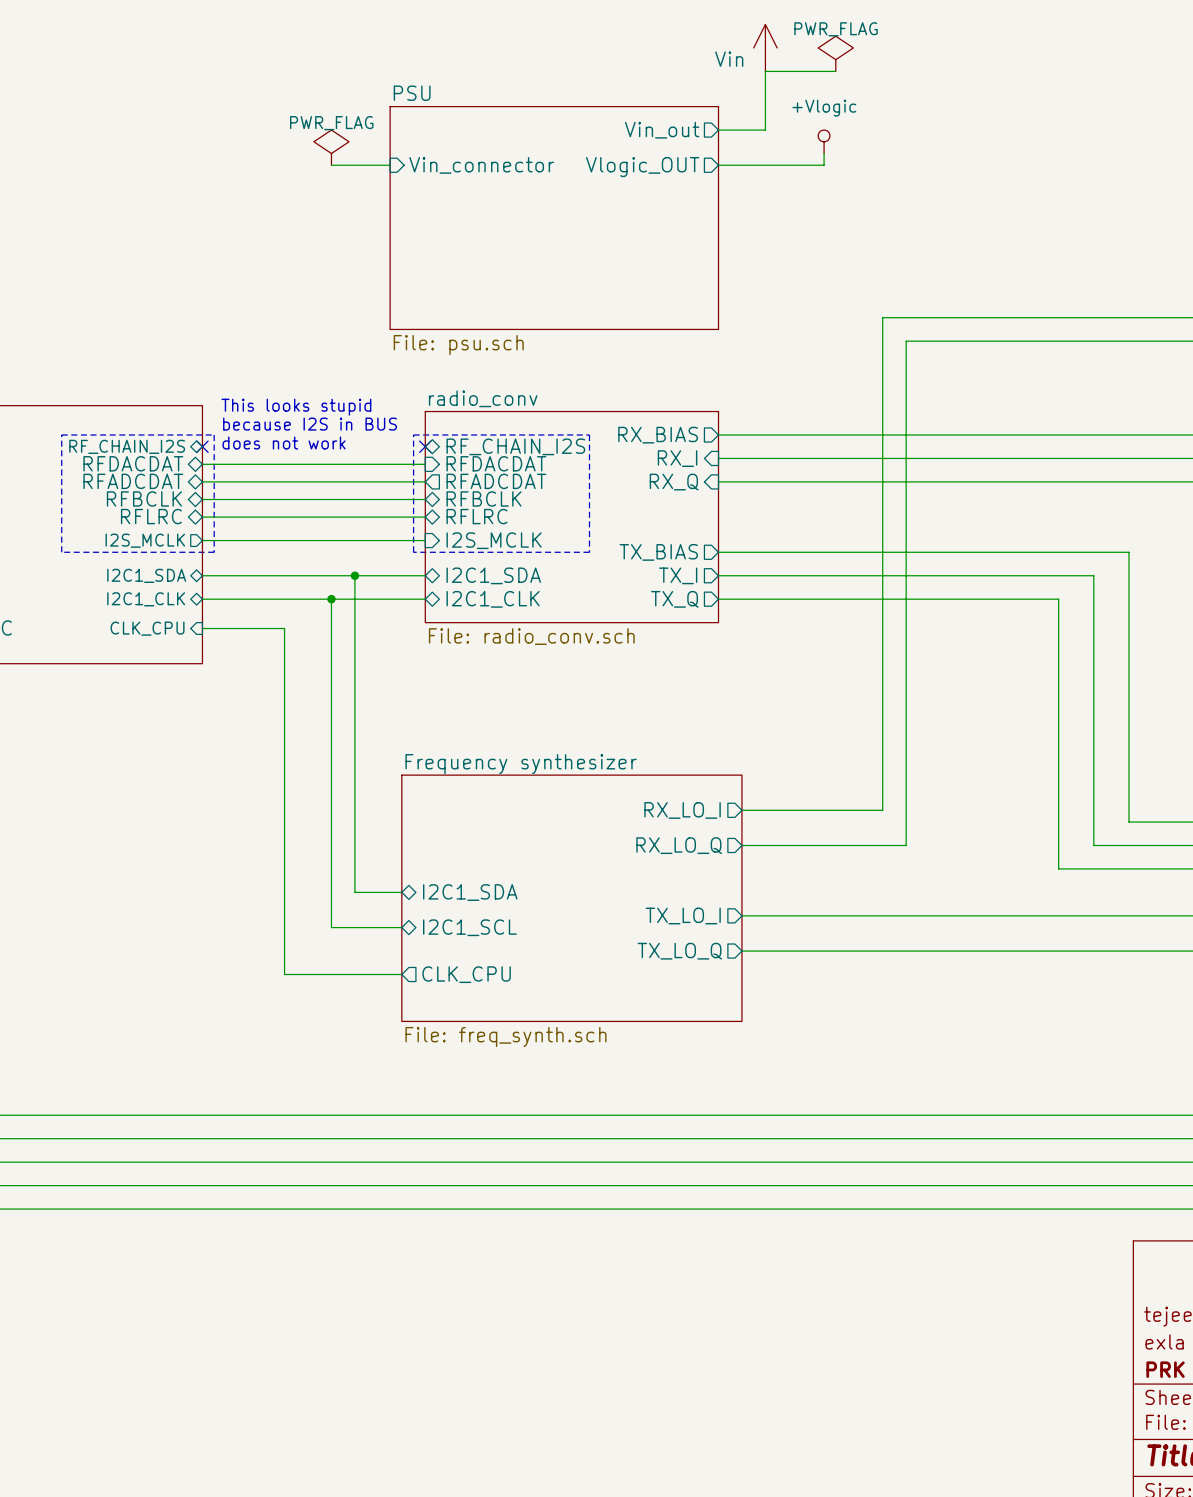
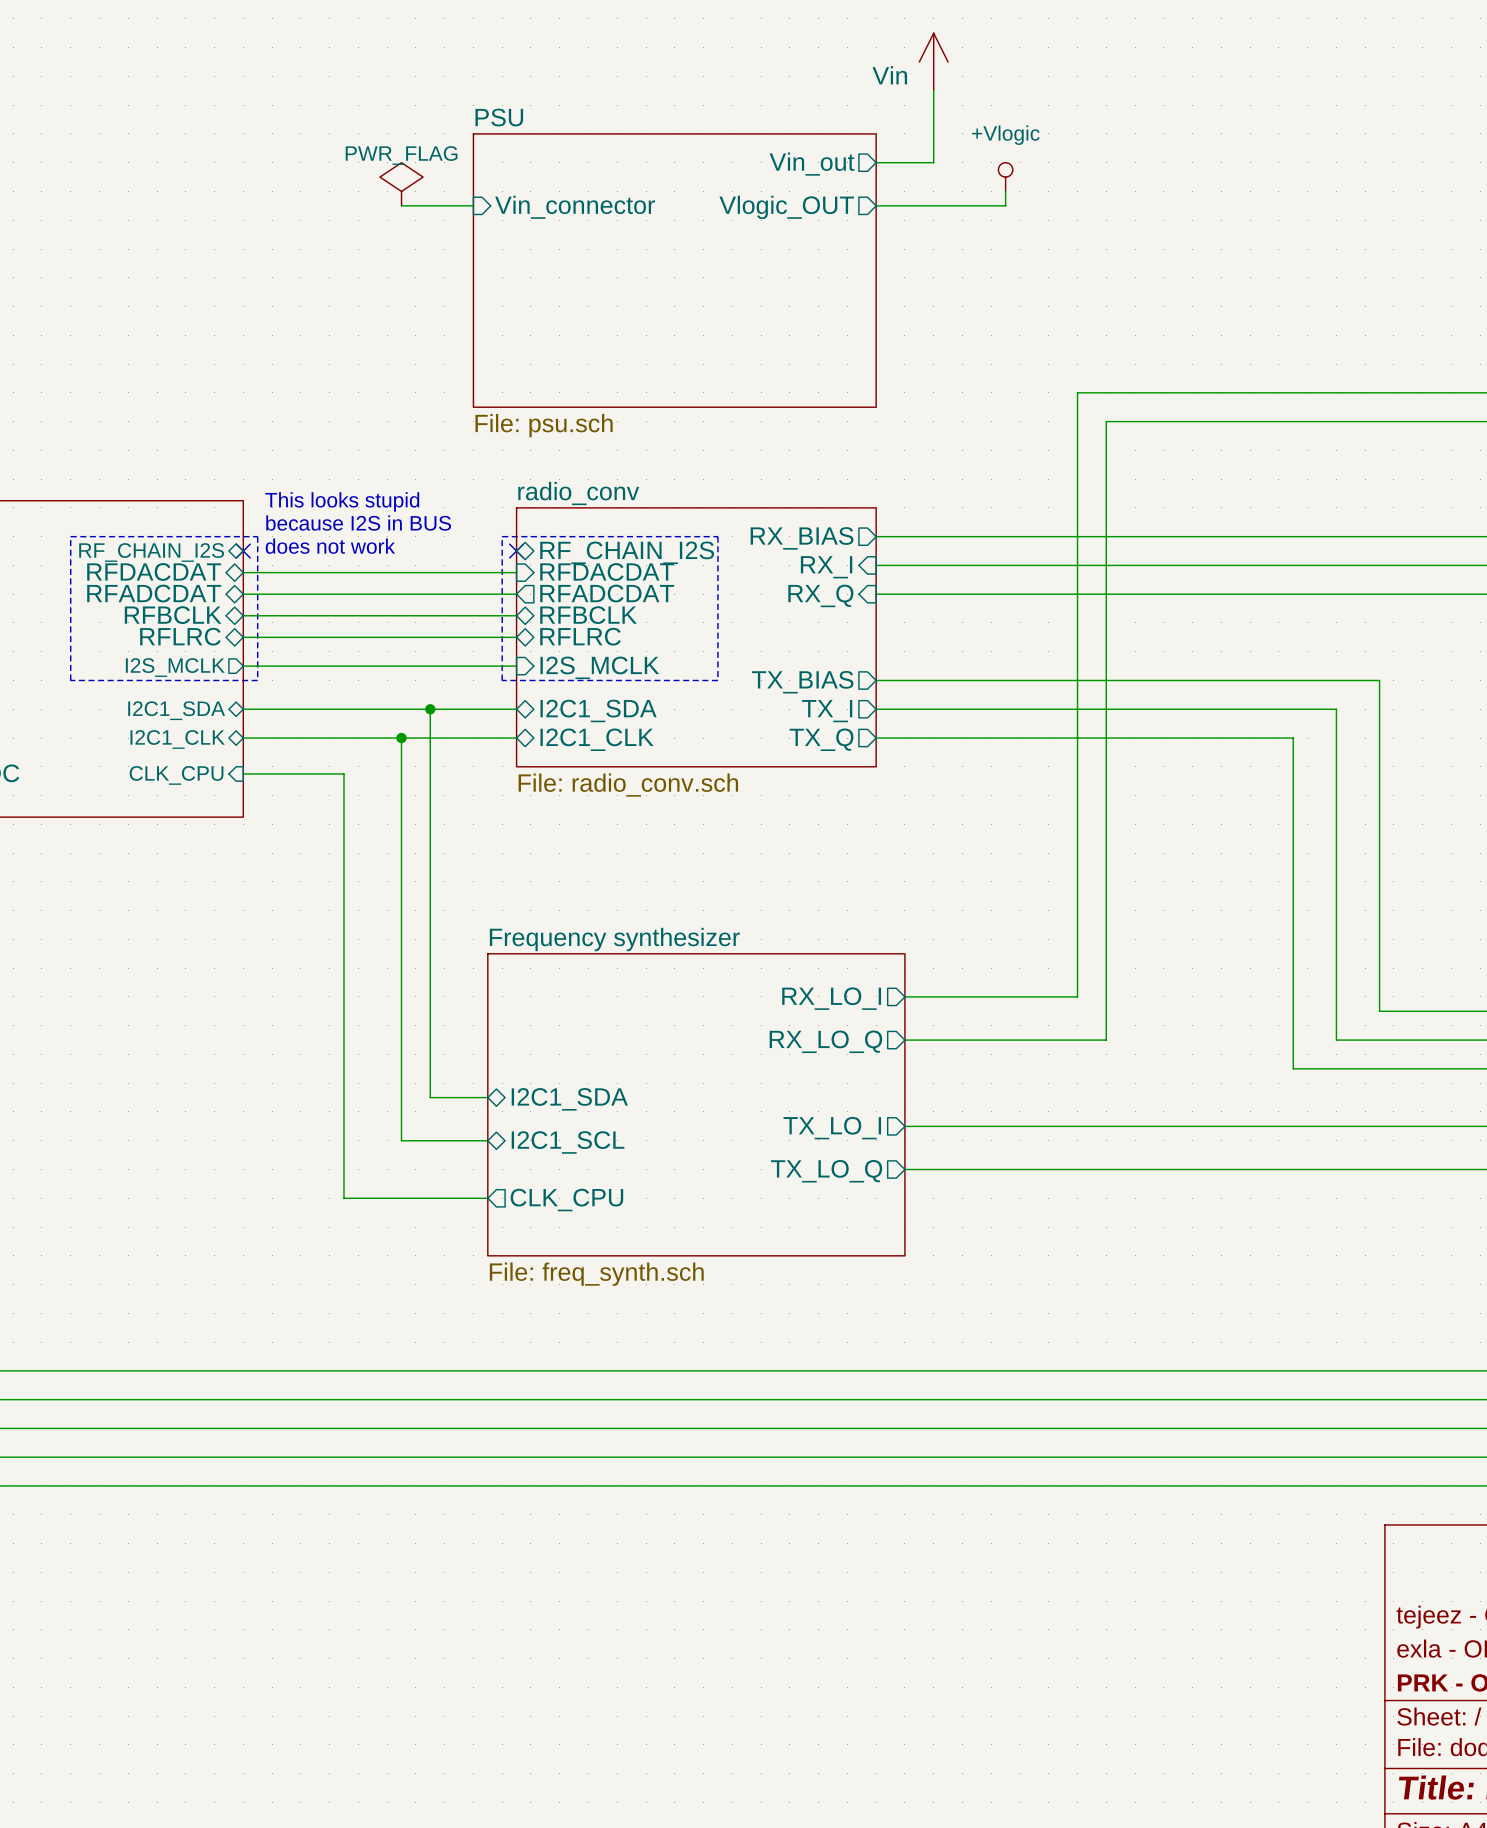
power symbol: PWR_FLAG (835, 53) -> none
wire: (765, 71) (835, 71) -> none

